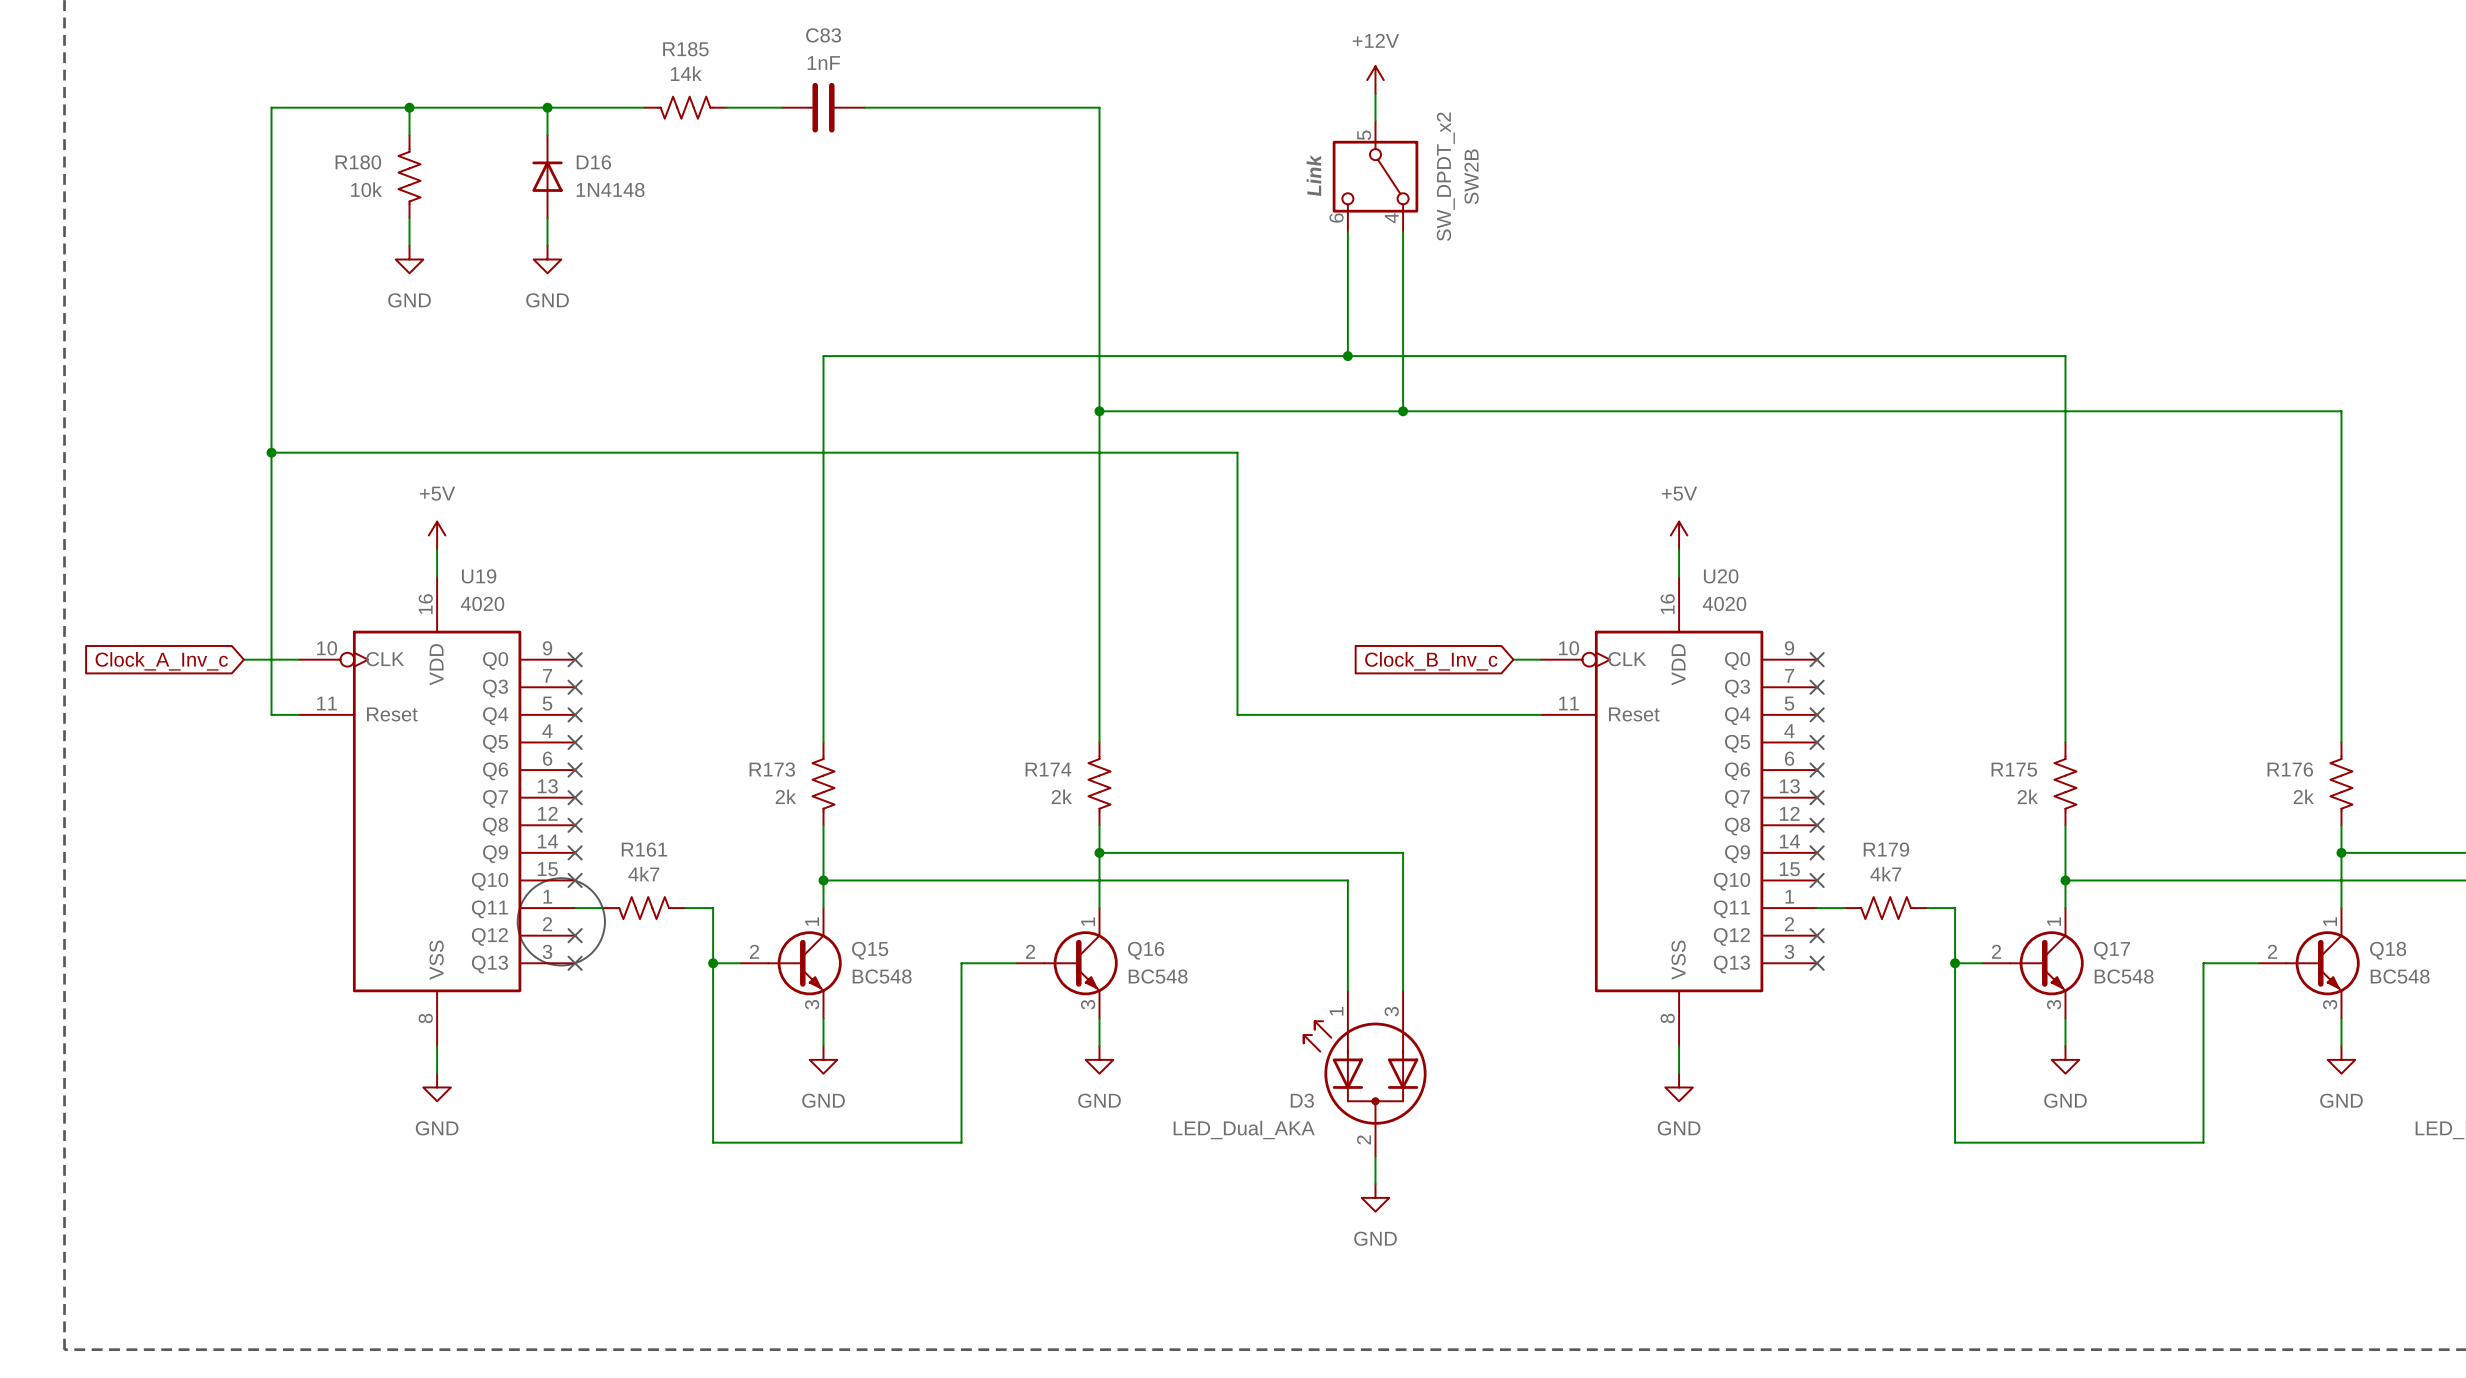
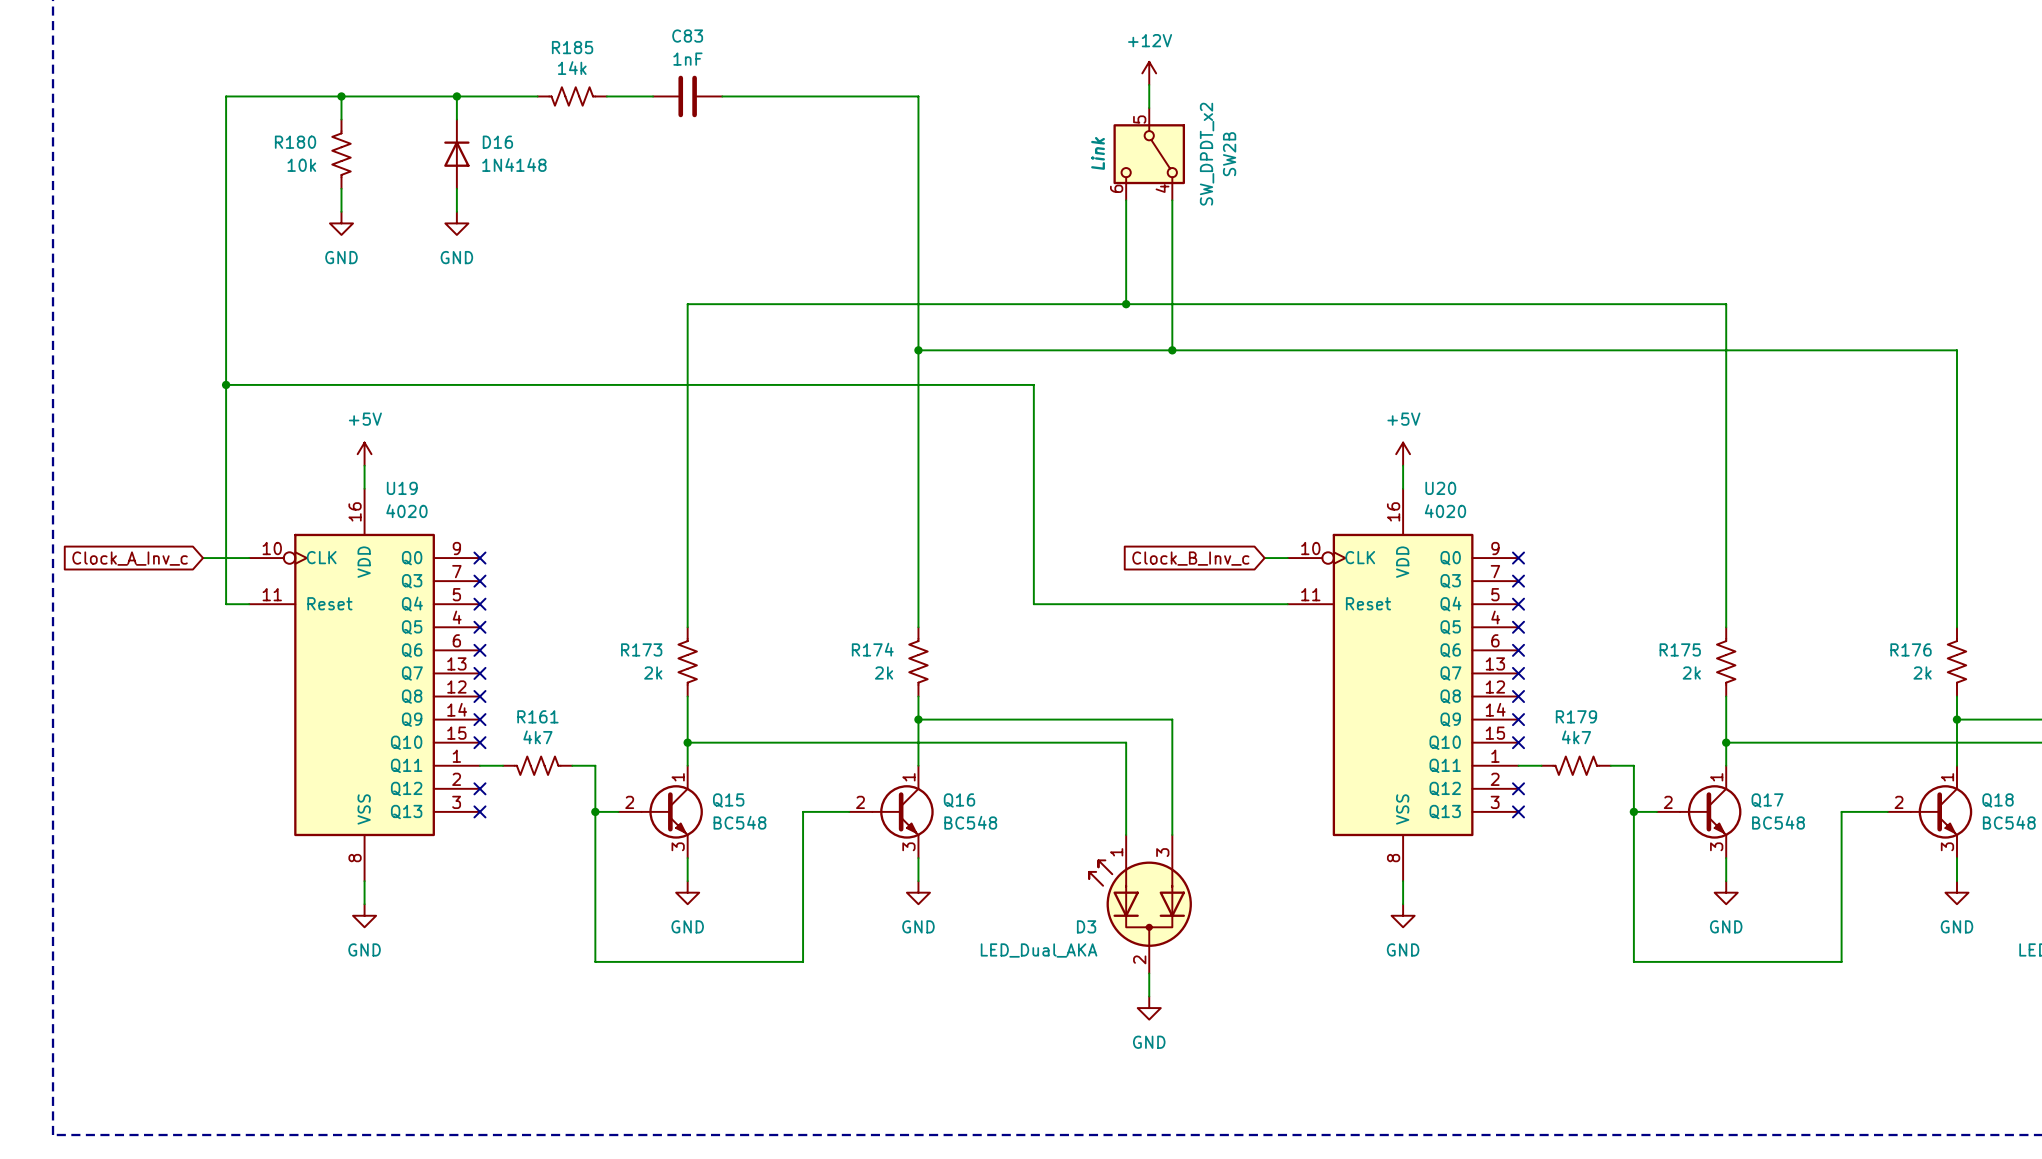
drawing: [517, 878, 605, 966] -> none

